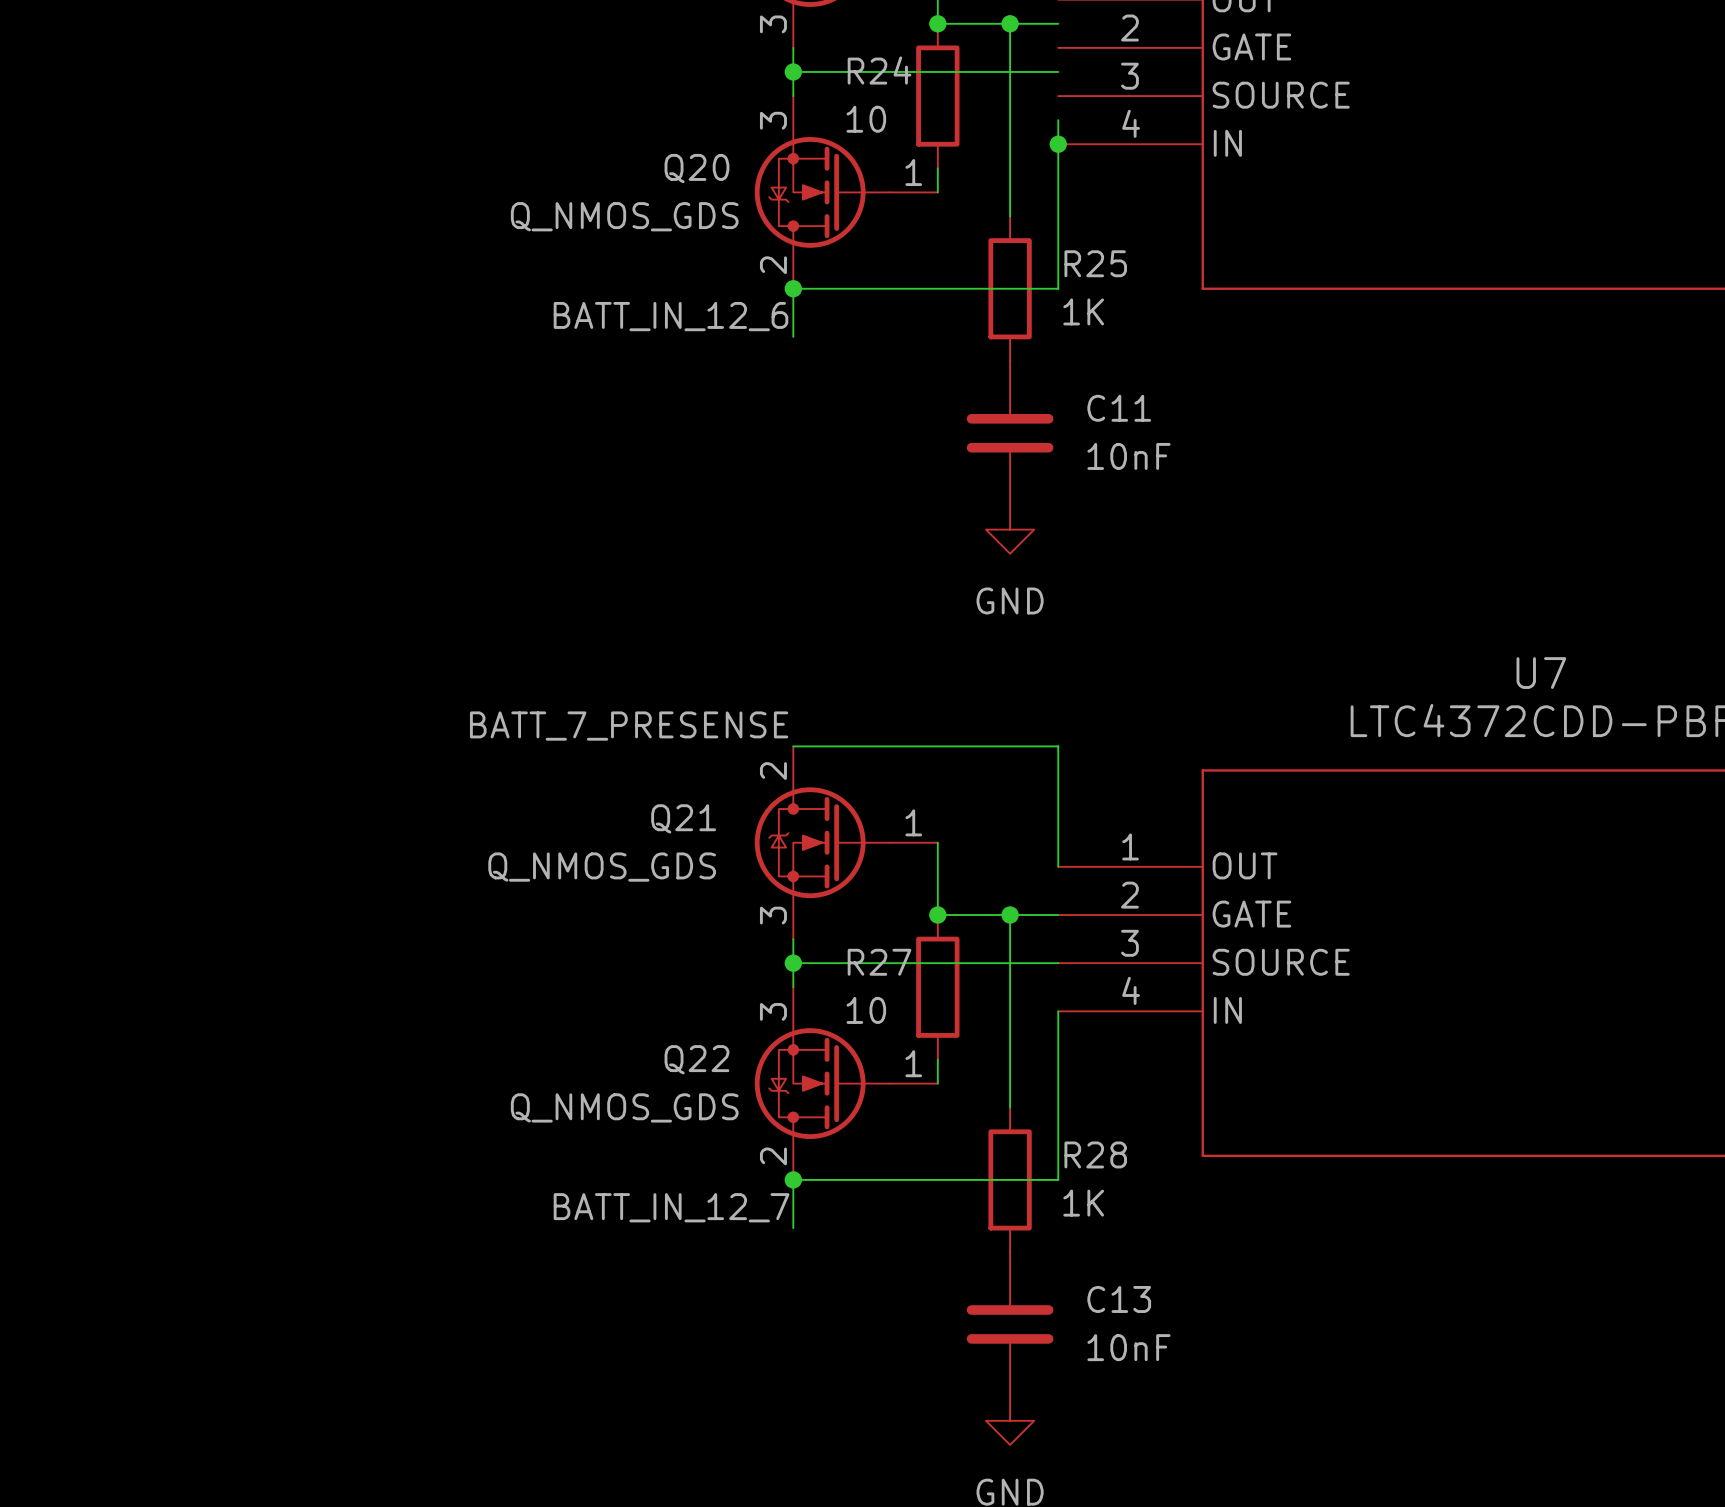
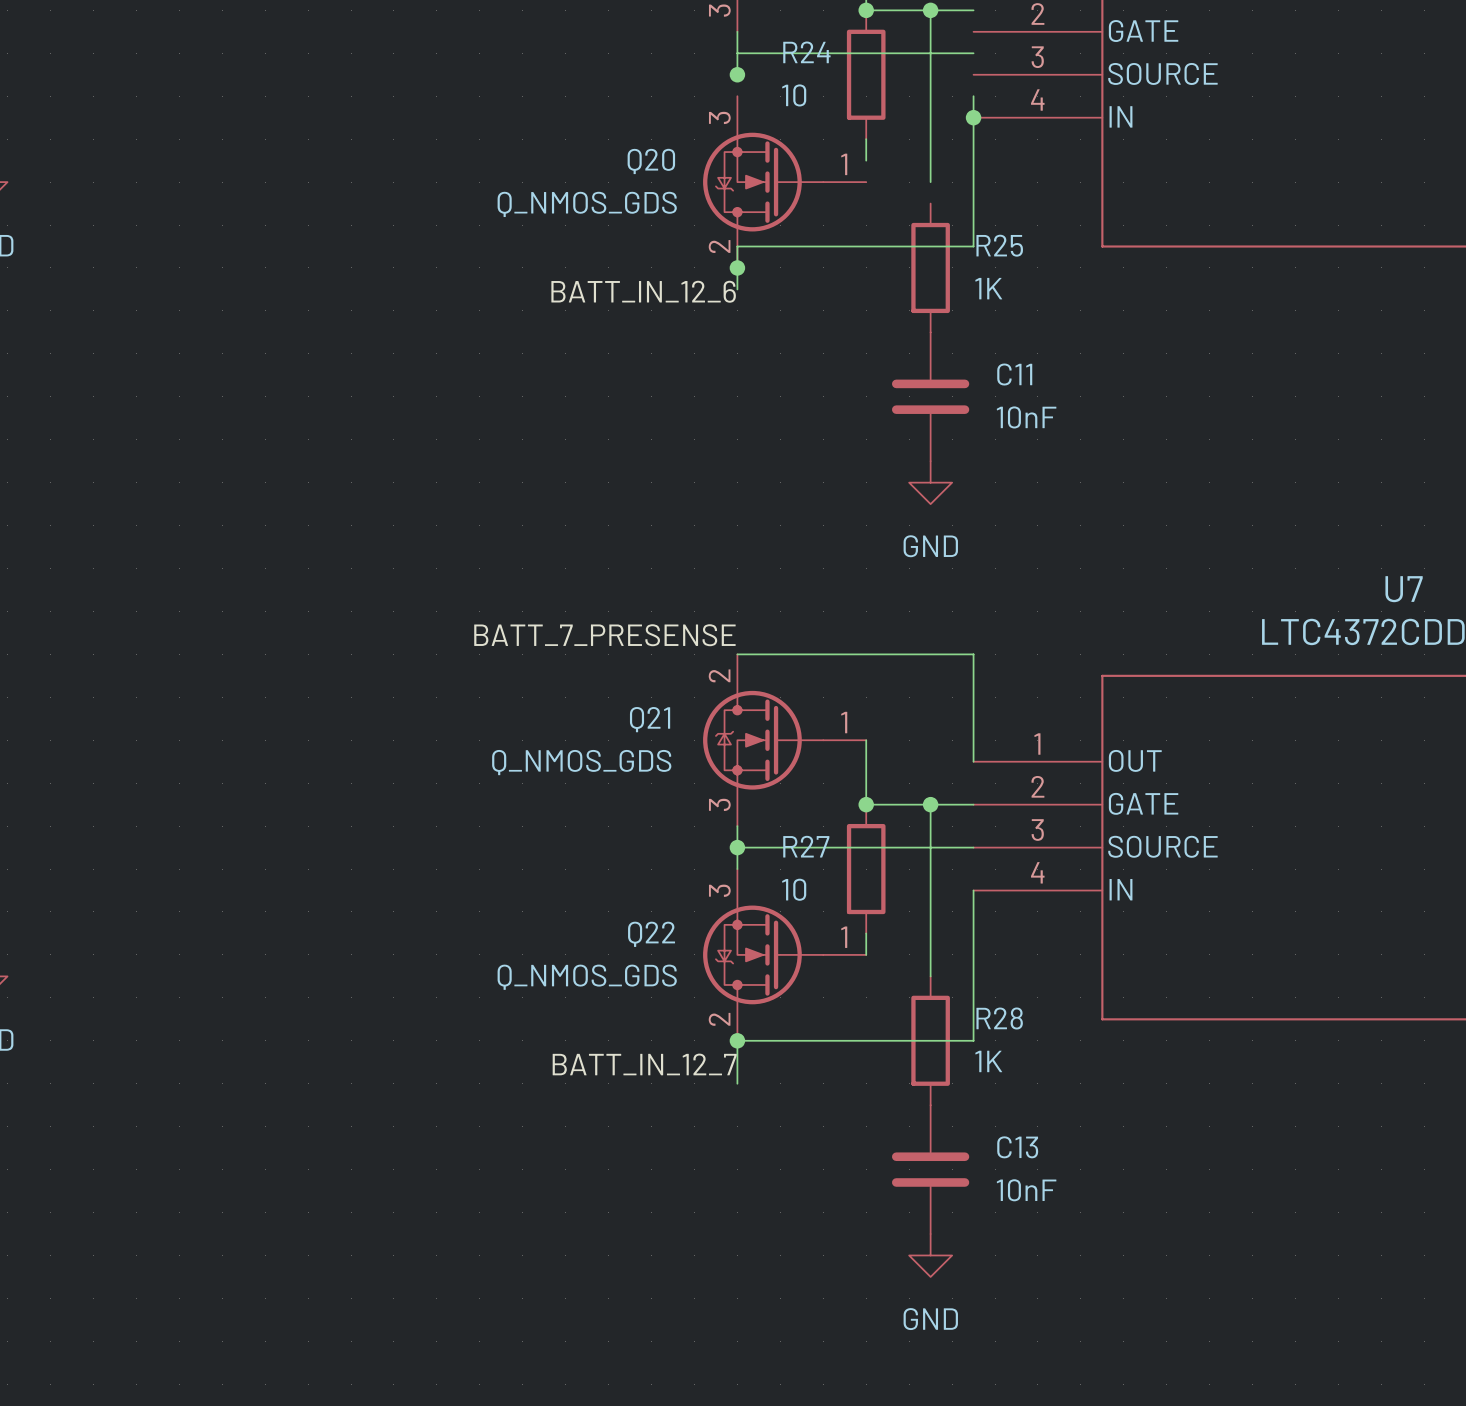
junction position: (793, 71) -> (737, 74)
Q20 position: (846, 192) -> (784, 182)
junction position: (793, 288) -> (737, 267)
R25 position: (1010, 288) -> (930, 267)
label position: BATT_IN_12_6 (670, 316) -> BATT_IN_12_6 (643, 291)
C11 position: (1010, 433) -> (930, 396)
power symbol position: GND (1010, 529) -> GND (930, 482)

